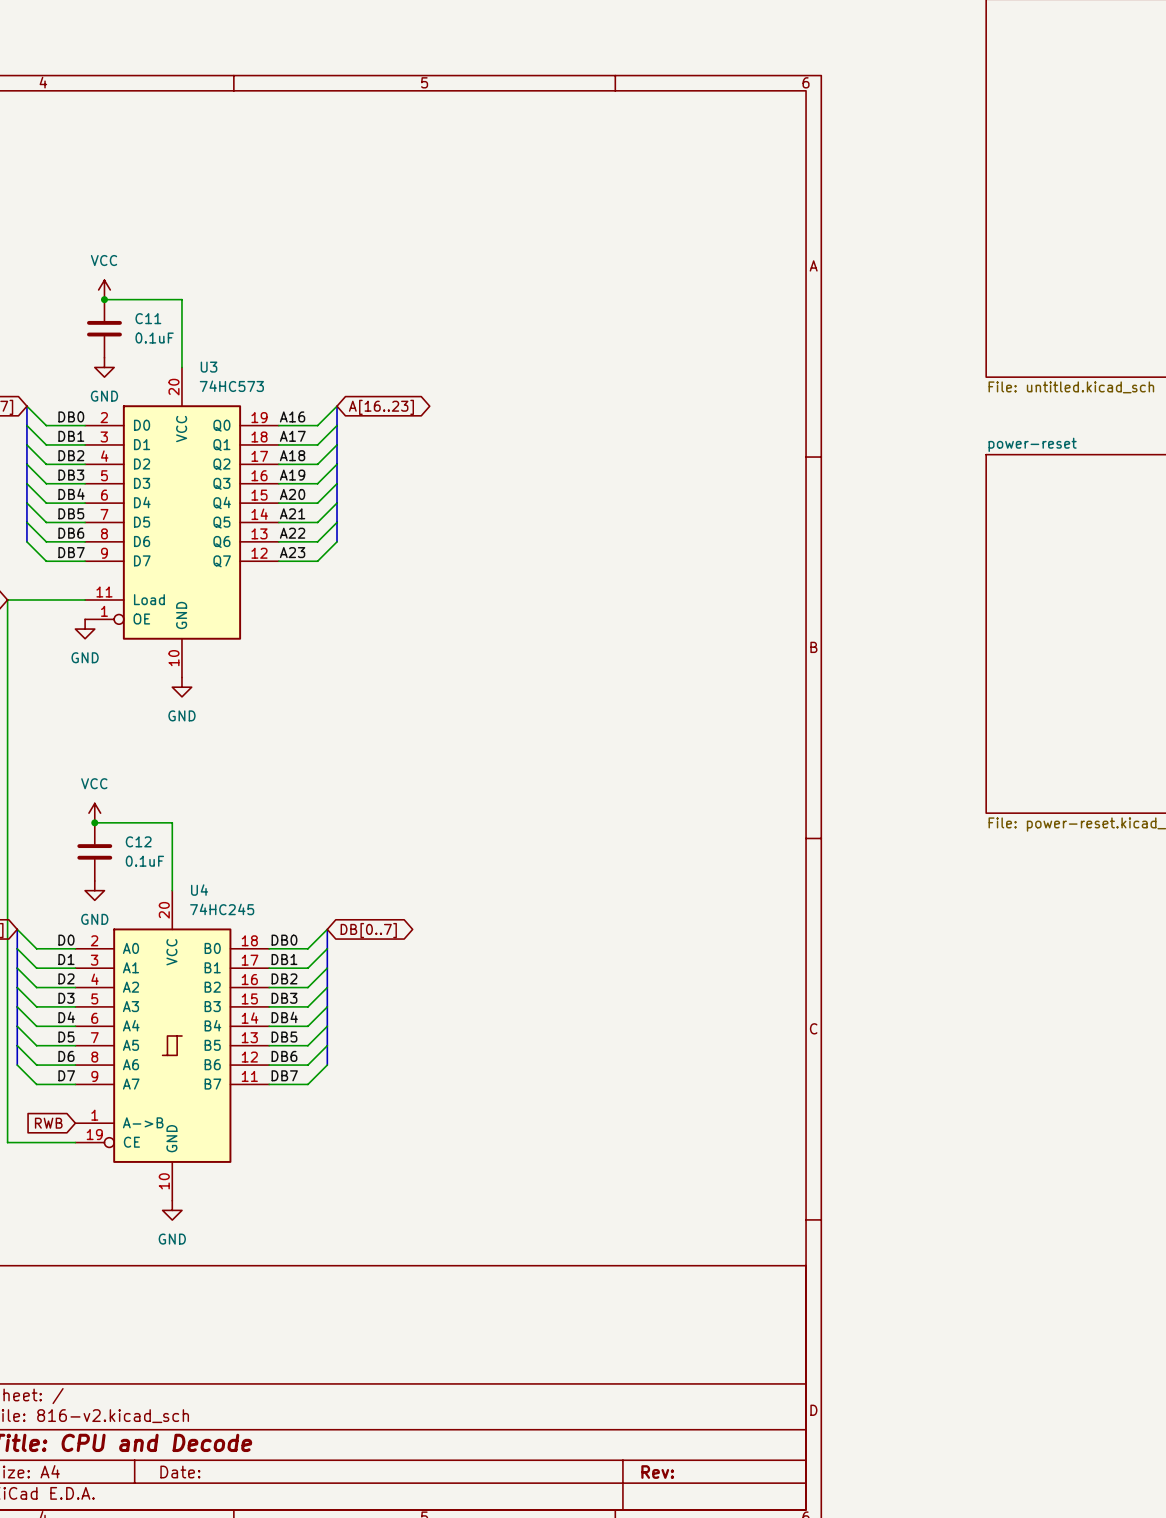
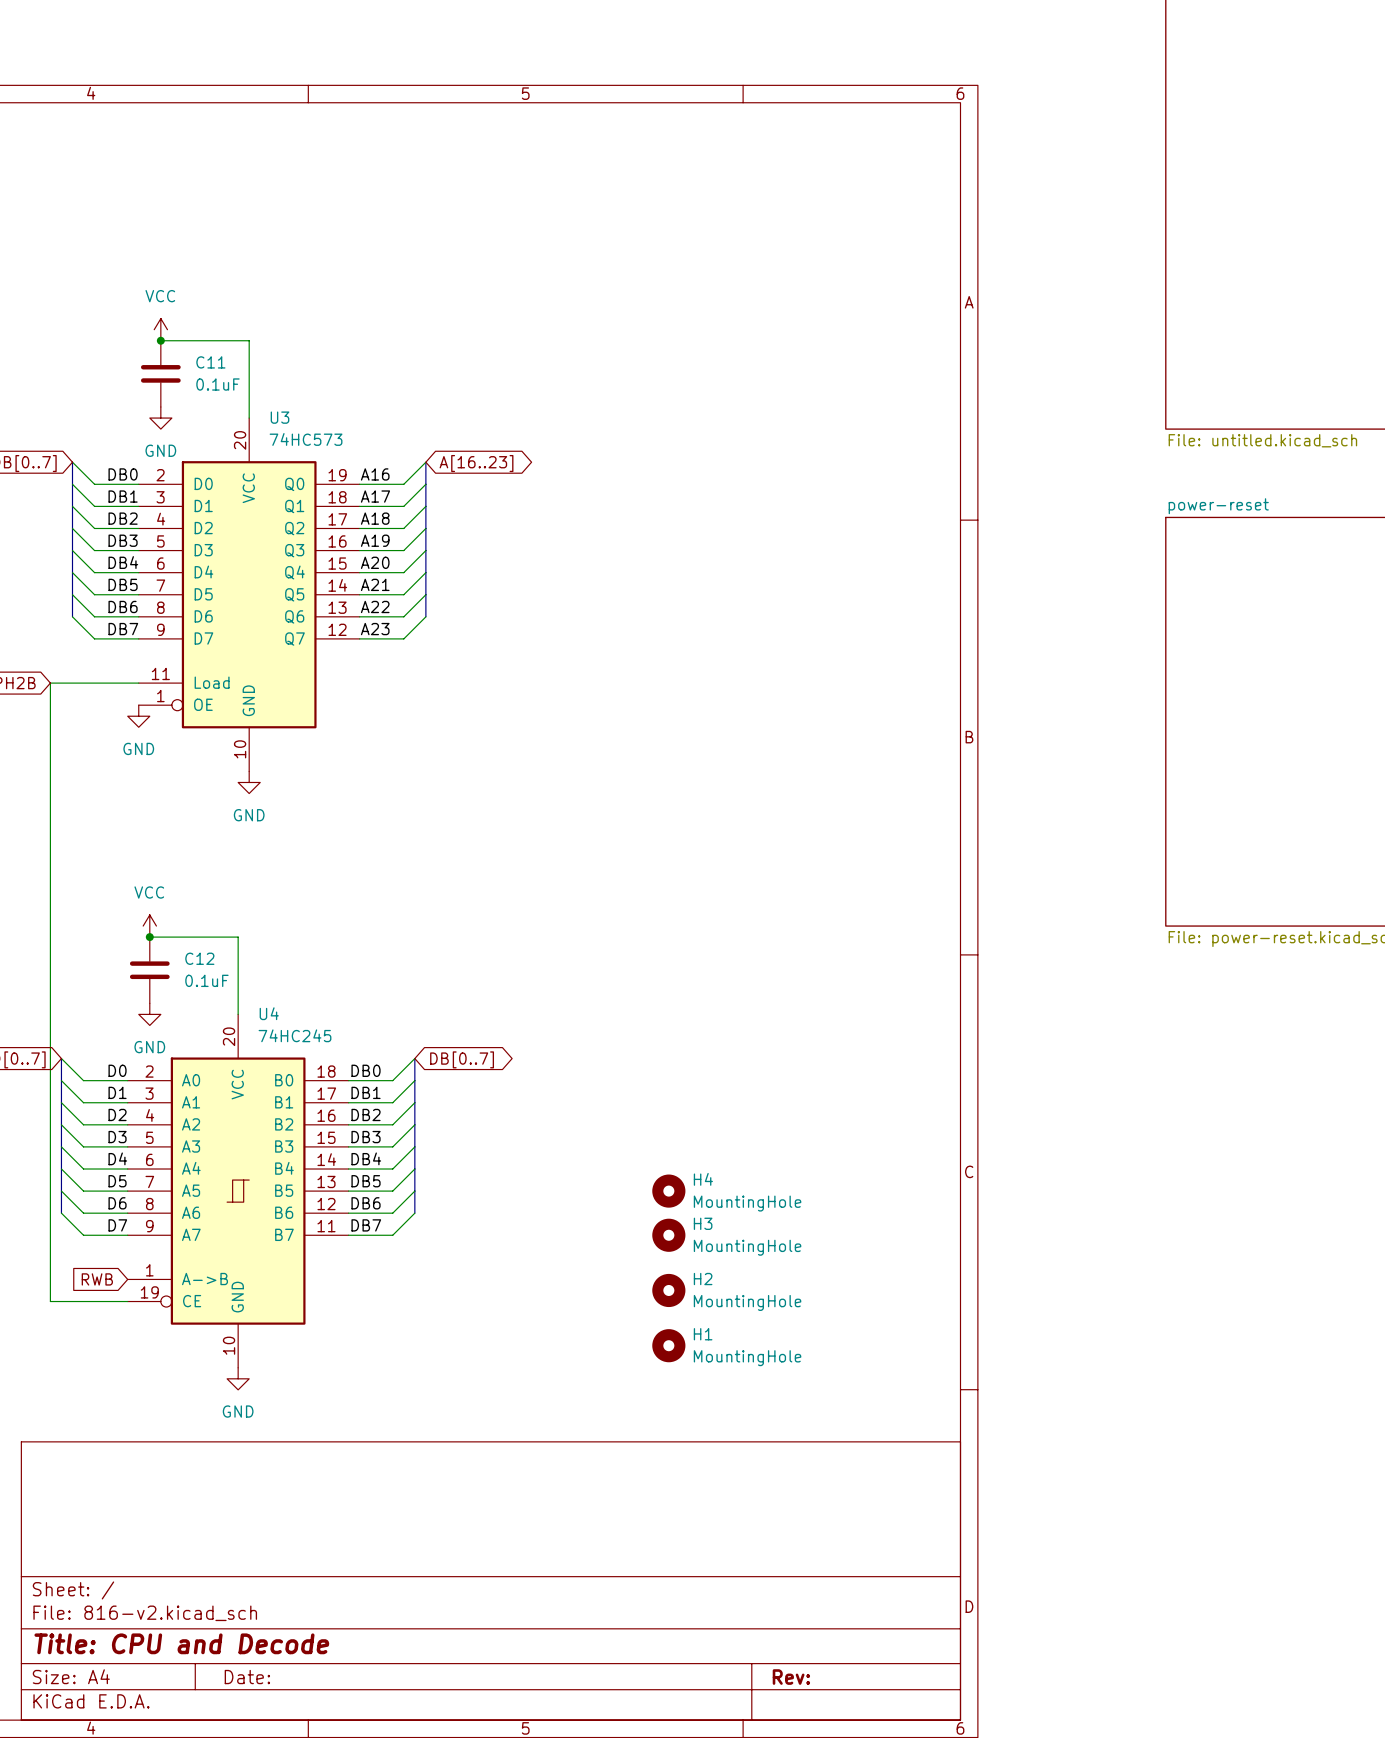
H4: none -> MountingHole (668, 1191)
H3: none -> MountingHole (668, 1235)
H2: none -> MountingHole (668, 1290)
H1: none -> MountingHole (668, 1345)

